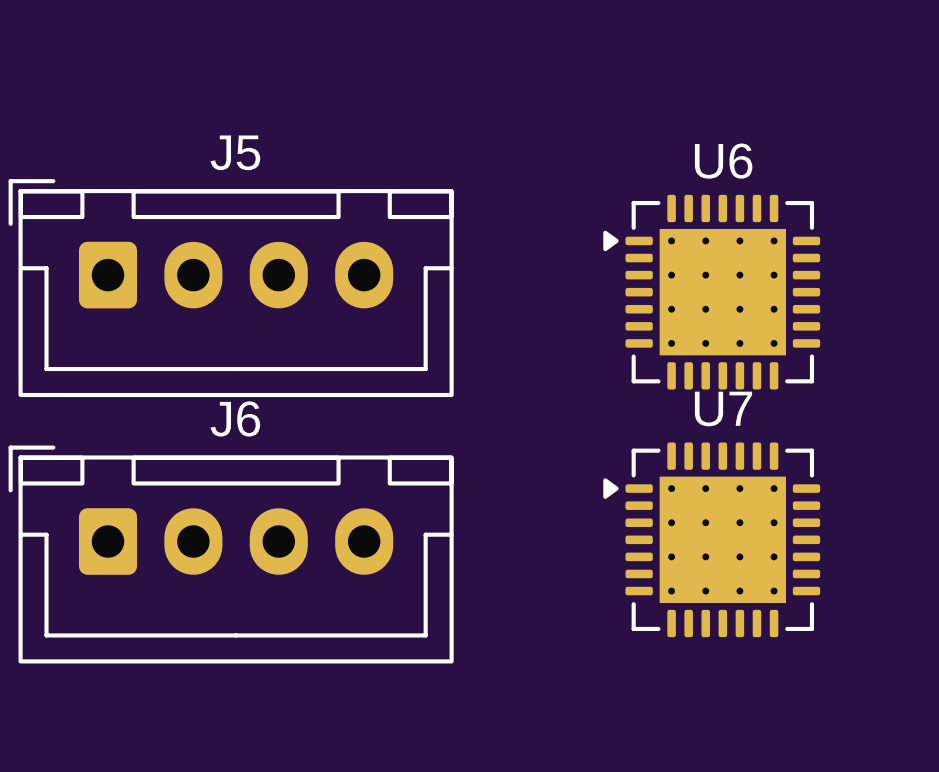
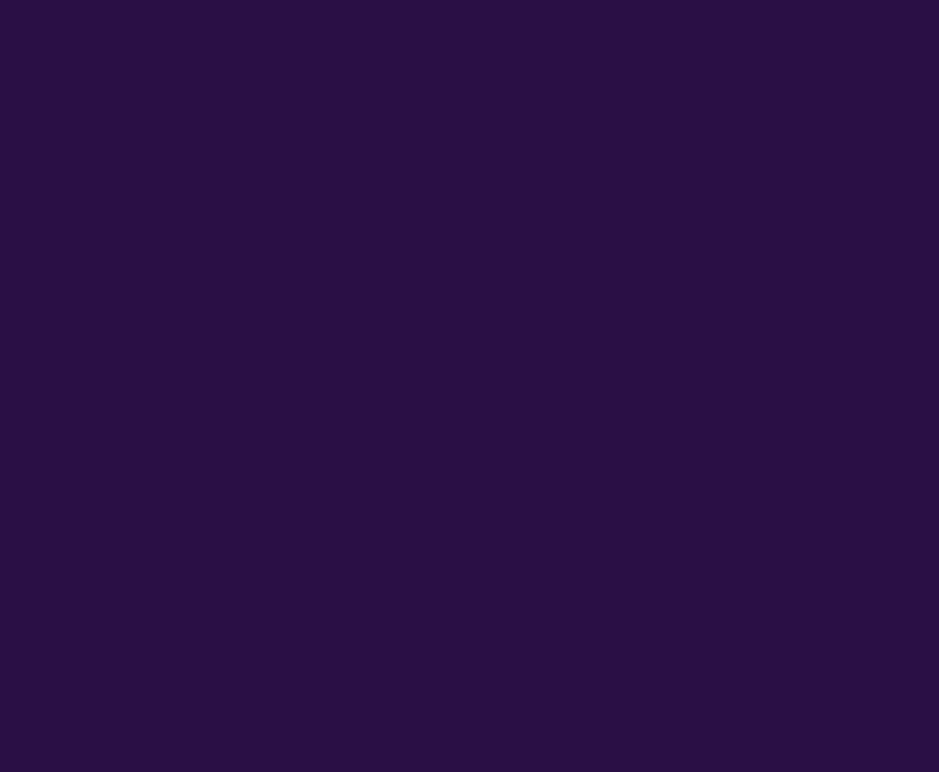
J5: (231, 288) -> none
U6: (711, 292) -> none
U7: (711, 539) -> none
J6: (231, 554) -> none

